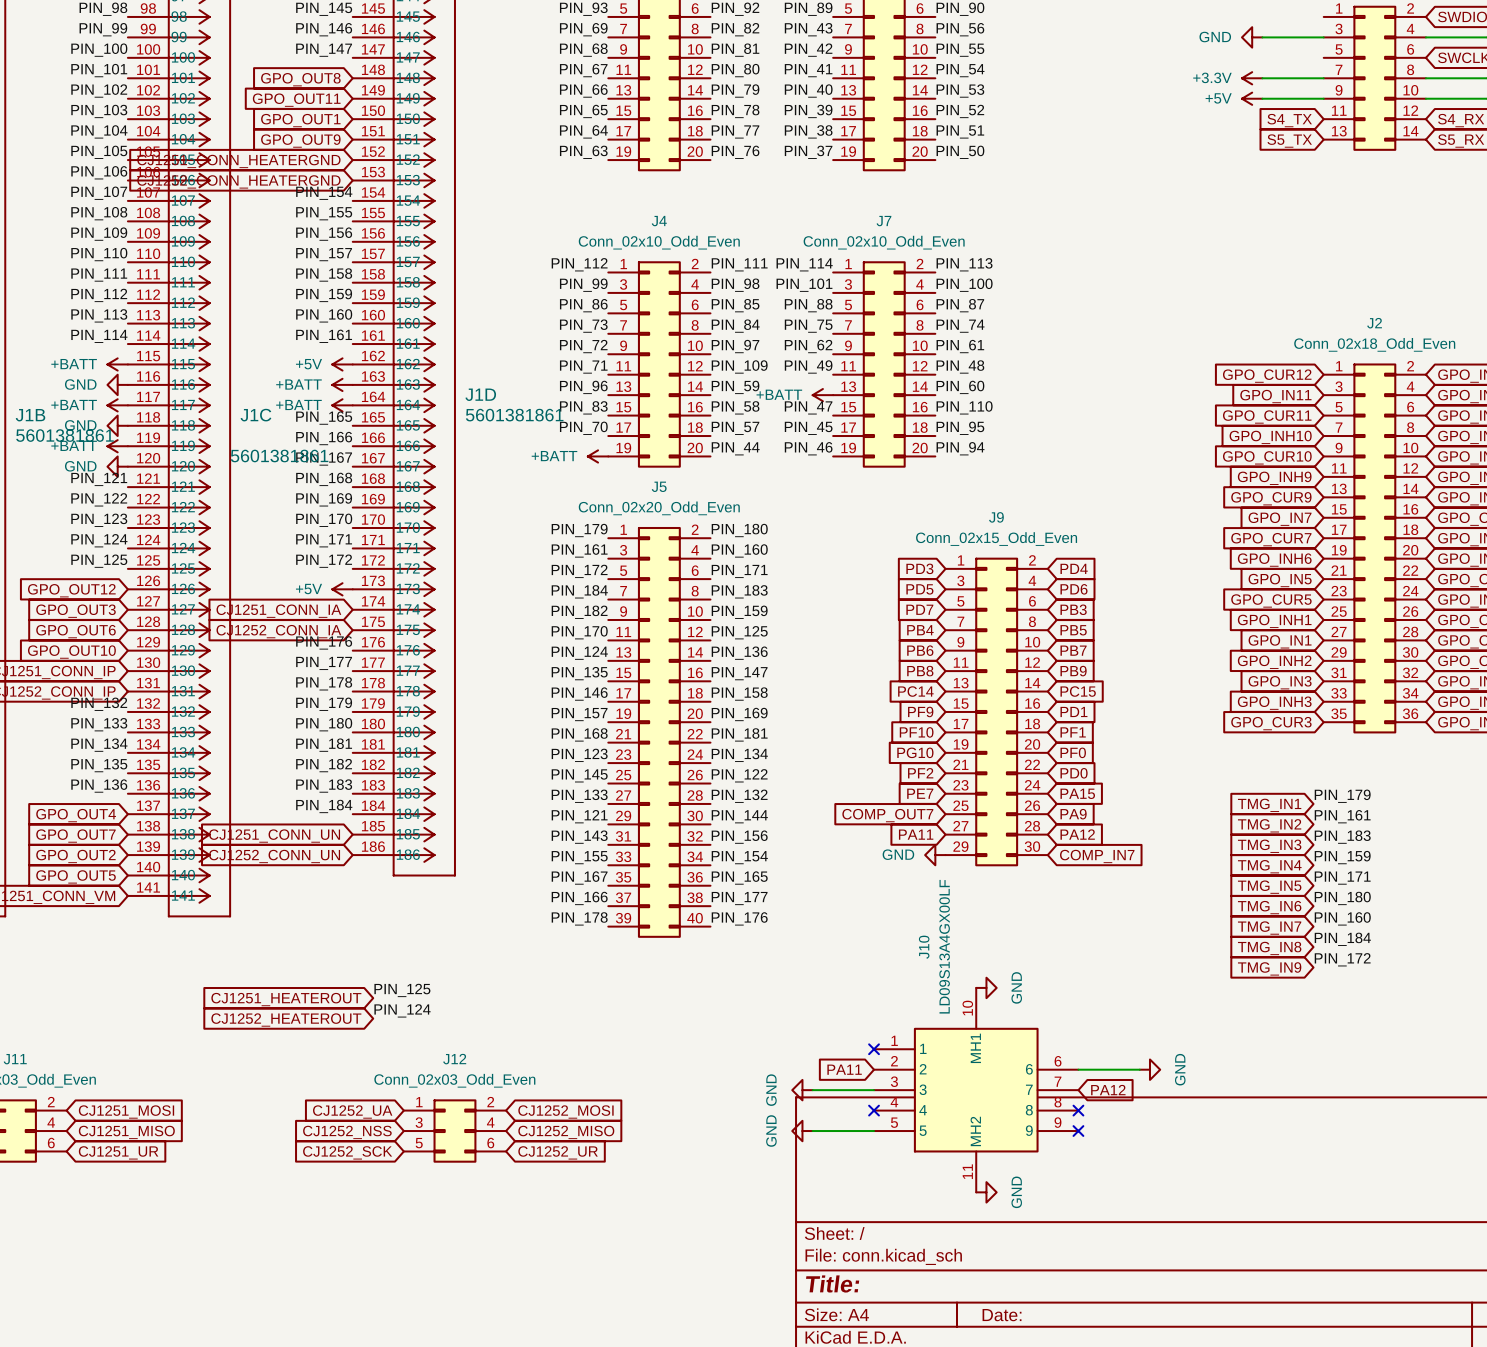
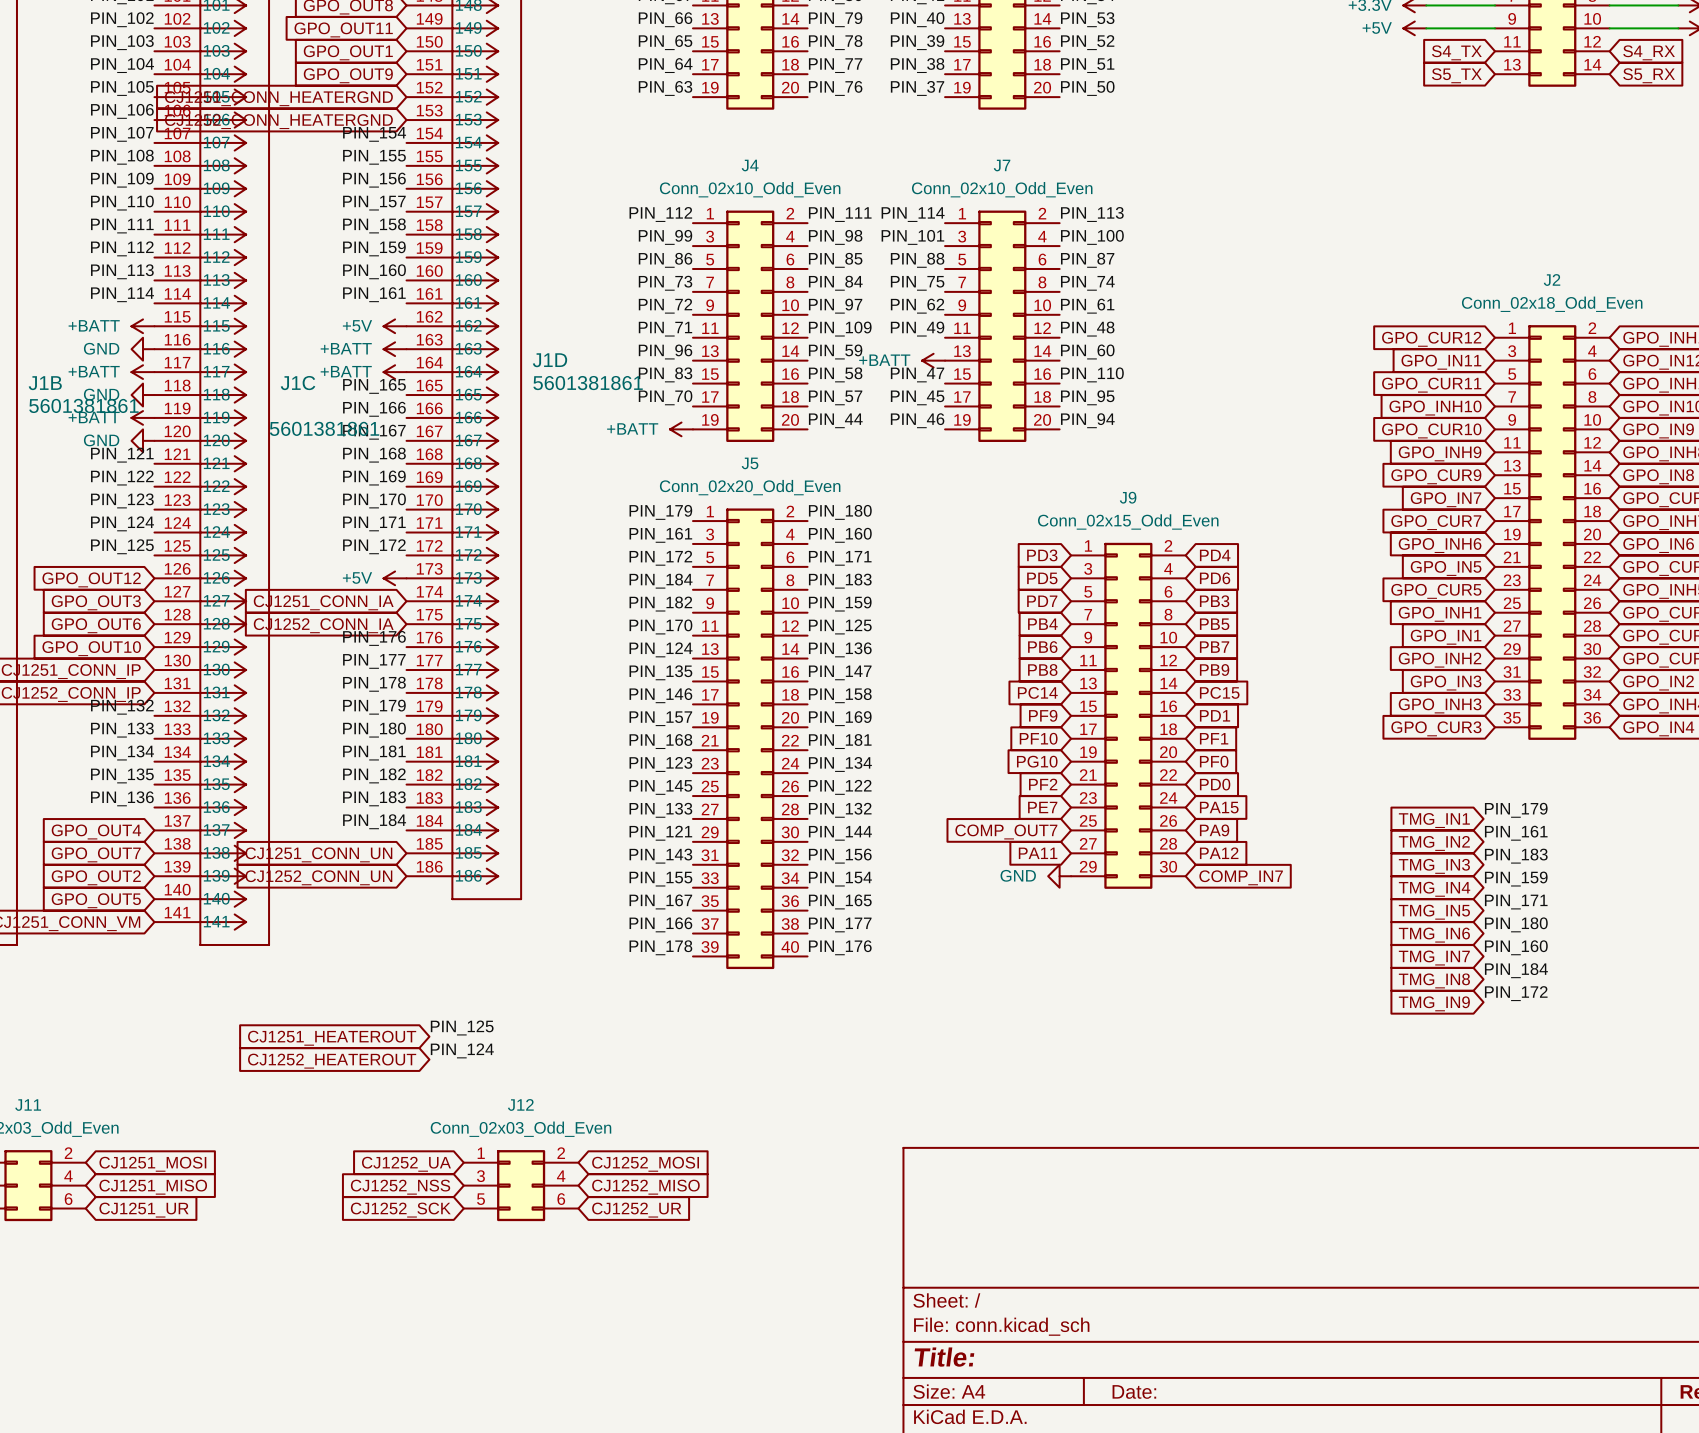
power symbol: GND (986, 987) -> none
no-connect mark: (874, 1049) -> none
global label: PA11 (844, 1069) -> none
wire: (1078, 1069) (1139, 1069) -> none
power symbol: GND (1149, 1069) -> none
power symbol: GND (802, 1090) -> none
wire: (812, 1090) (874, 1090) -> none
J10: LD09S13A4GX00LF (976, 1090) -> none
global label: PA12 (1108, 1090) -> none
no-connect mark: (874, 1110) -> none
no-connect mark: (1078, 1110) -> none
power symbol: GND (802, 1131) -> none
wire: (812, 1131) (874, 1131) -> none
no-connect mark: (1078, 1131) -> none
power symbol: GND (986, 1192) -> none

